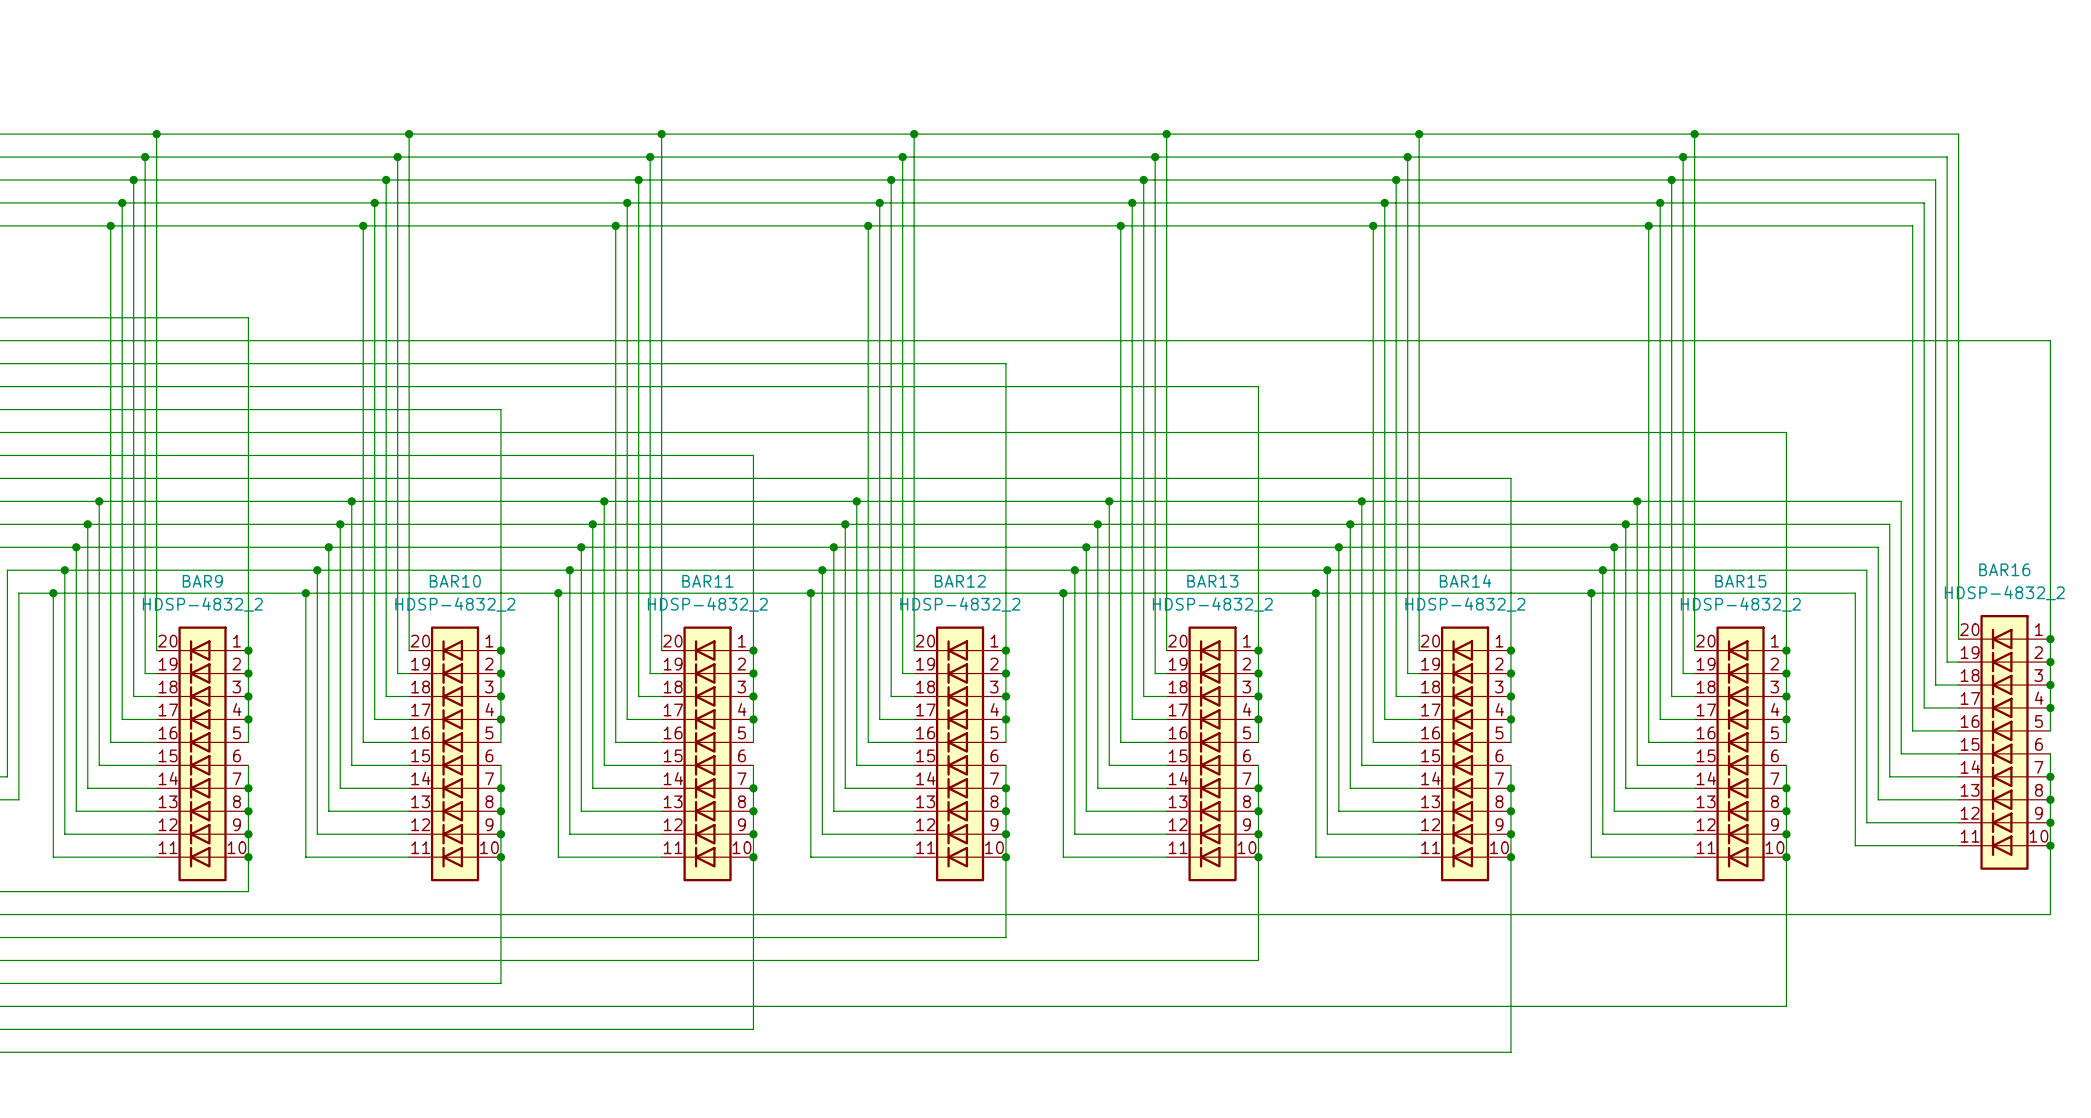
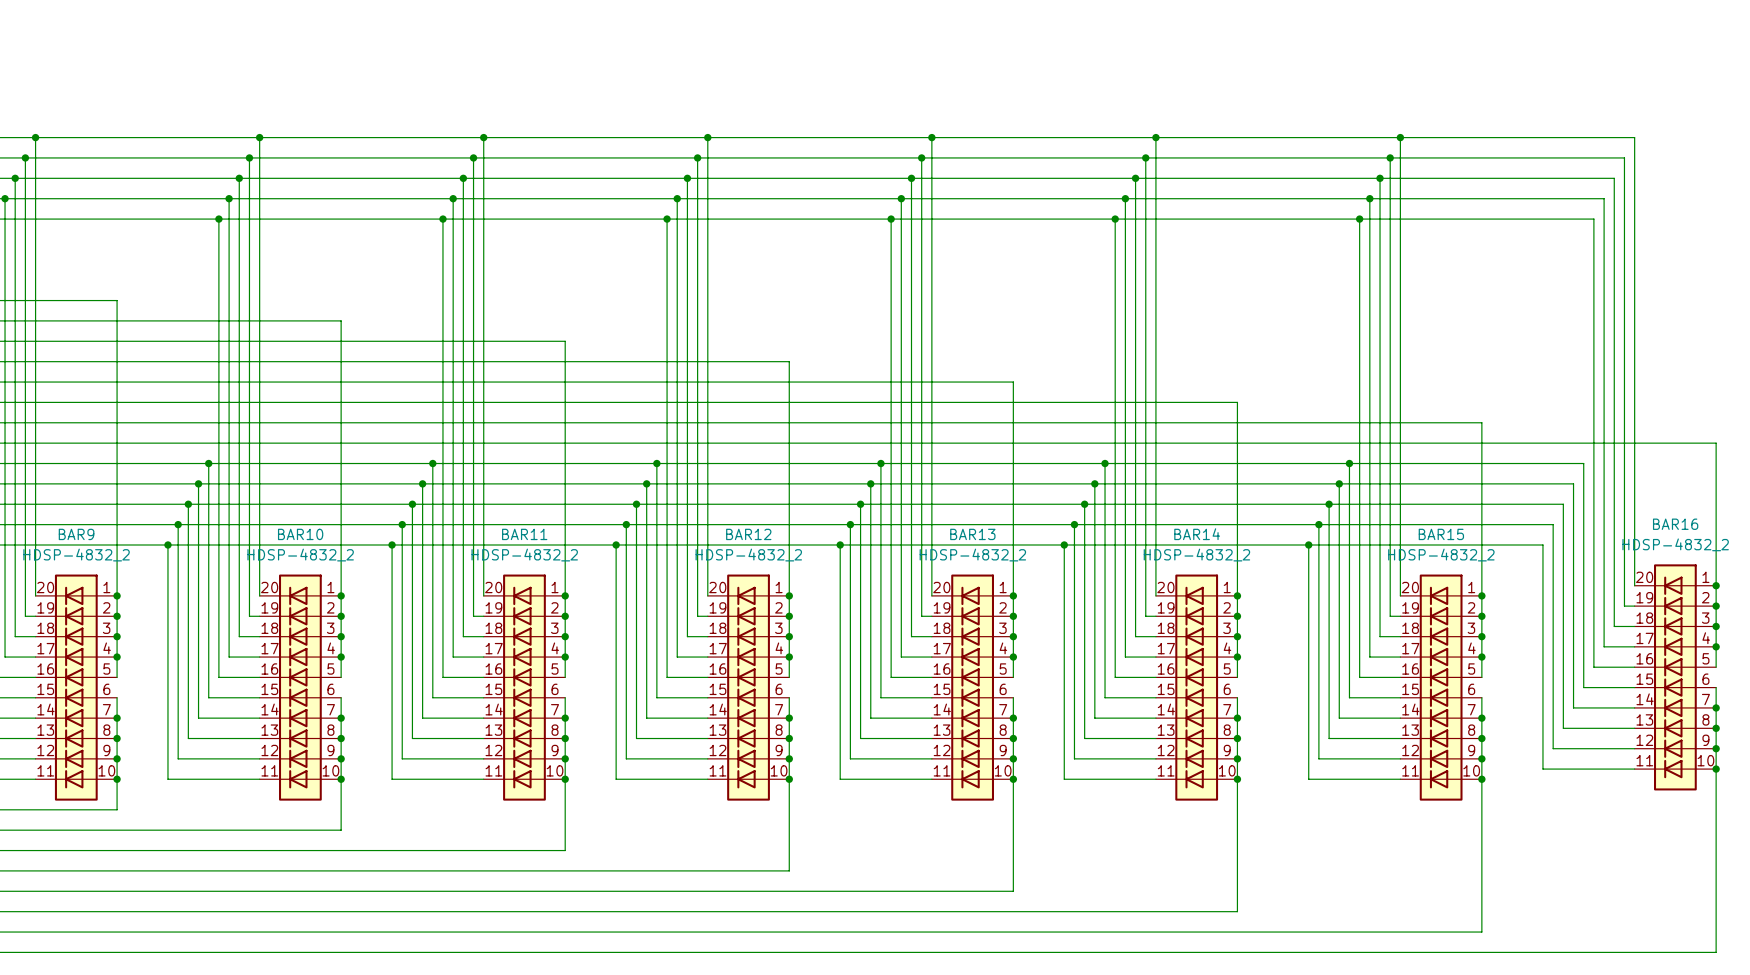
wire: (500, 340) (2050, 340) (2050, 478) -> none
wire: (753, 363) (1005, 363) (1005, 386) (1258, 386) (1258, 409) -> (341, 320) (341, 382) (1013, 382)
wire: none -> (565, 341) (565, 422) (1481, 422)
wire: (1510, 432) (1786, 432) (1786, 455) -> (1237, 402) (1237, 443) (1716, 443)
wire: (2050, 914) (500, 914) (500, 983) -> (1013, 870) (1013, 891) (341, 891)
wire: (1005, 937) (753, 937) (753, 1029) -> (1481, 911) (1481, 932) (565, 932)
wire: (1005, 960) (1258, 960) -> (789, 870) (789, 850)
wire: (1786, 1006) (1510, 1006) (1510, 1052) -> (1716, 830) (1716, 952) (1237, 952)

